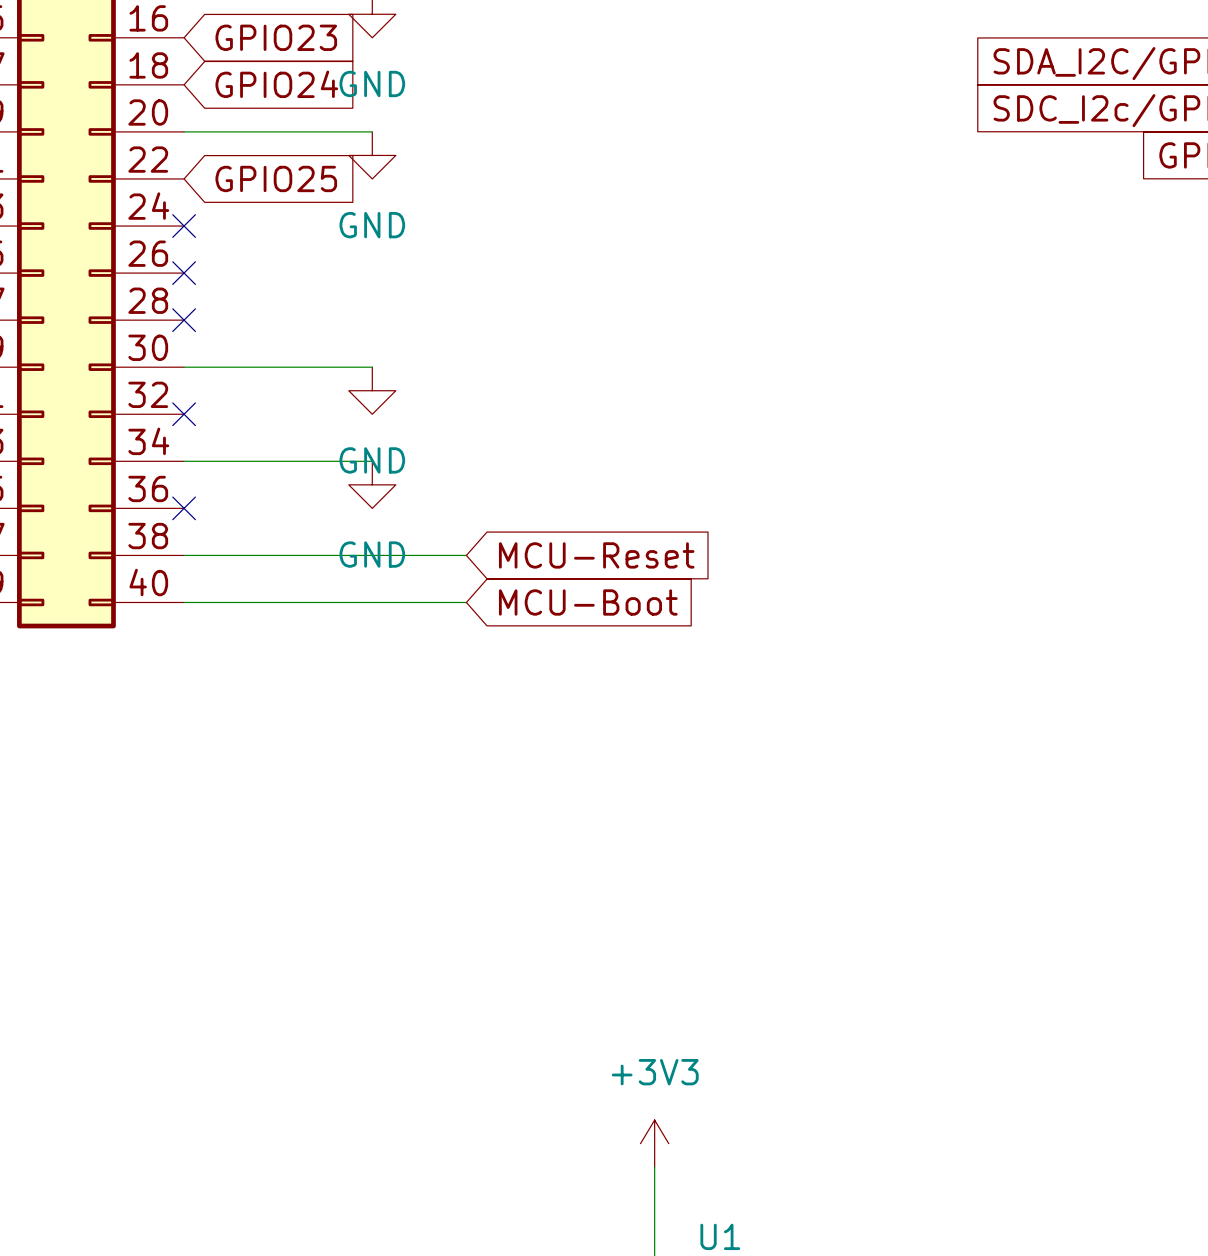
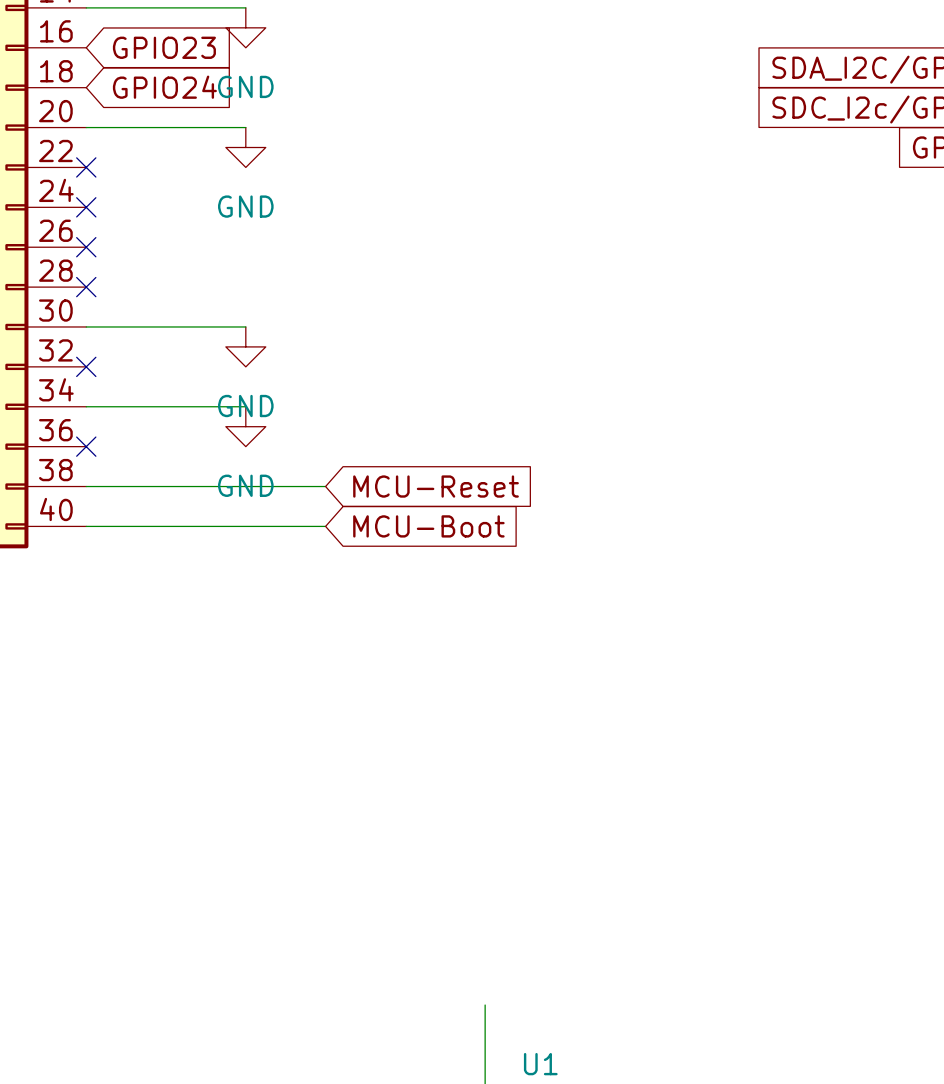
no-connect mark: none -> (86, 167)
global label: GPIO25 (276, 178) -> none
power symbol: +3V3 (654, 1143) -> none

